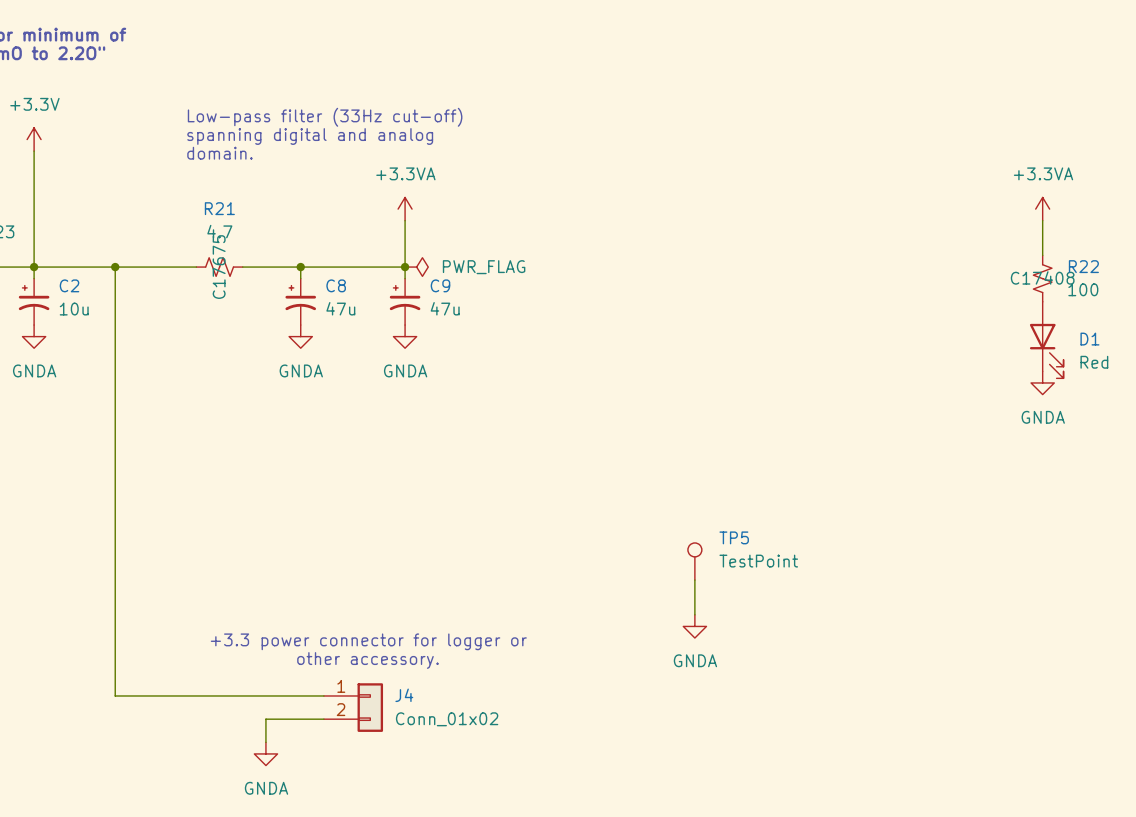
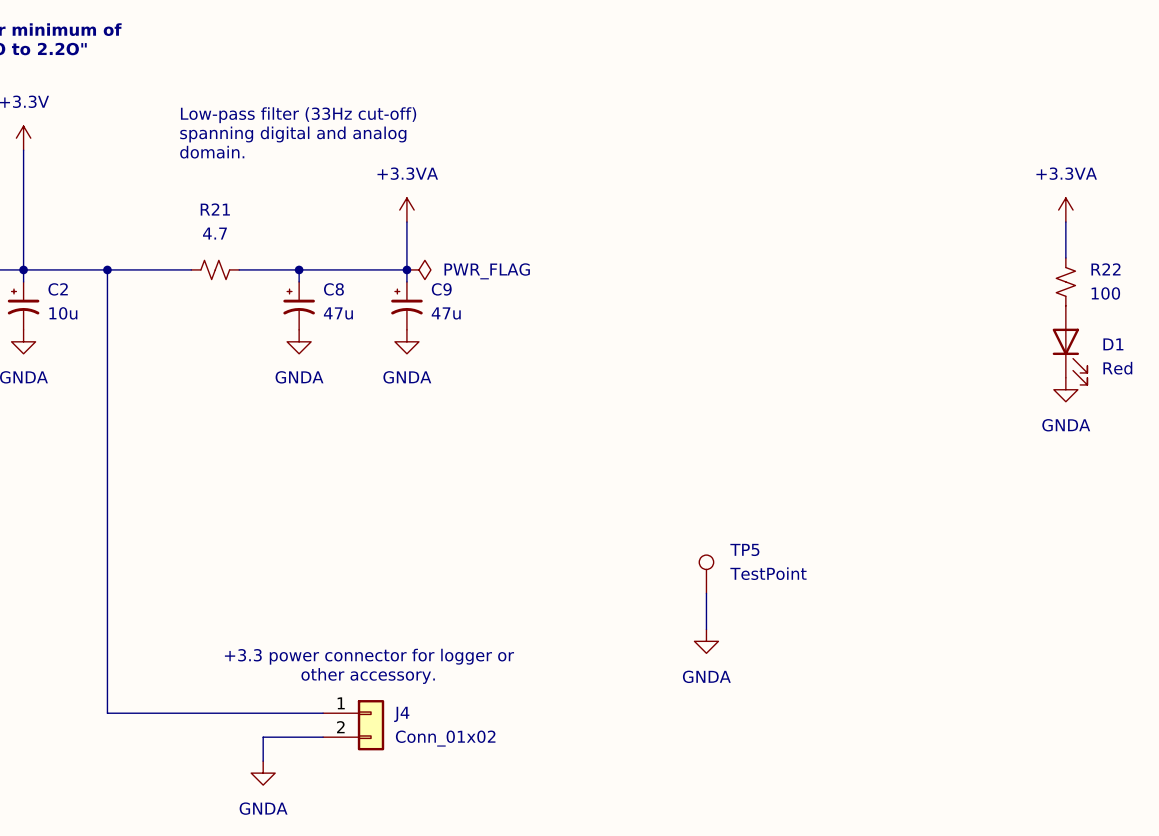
R21 text: C17675 (219, 267) -> none
R22 text: C17408 (1042, 277) -> none

